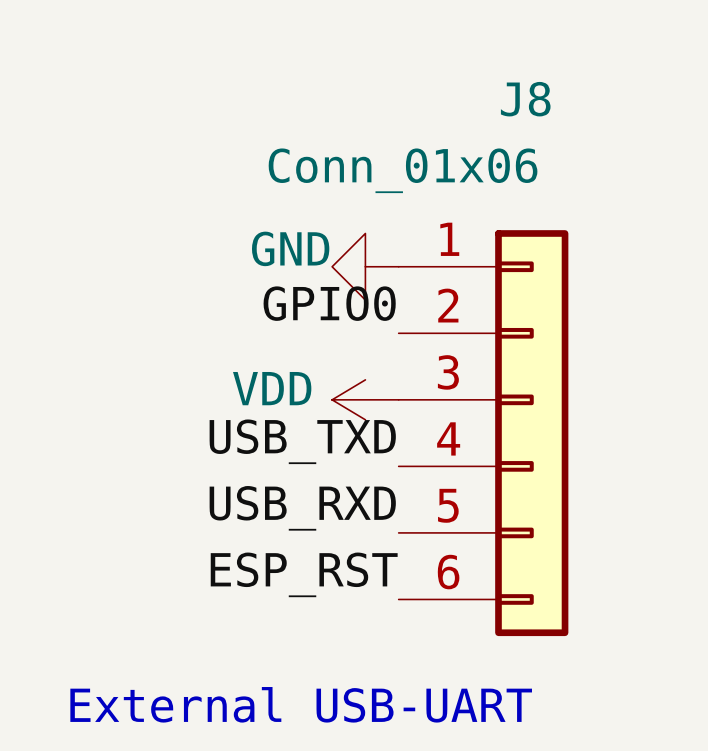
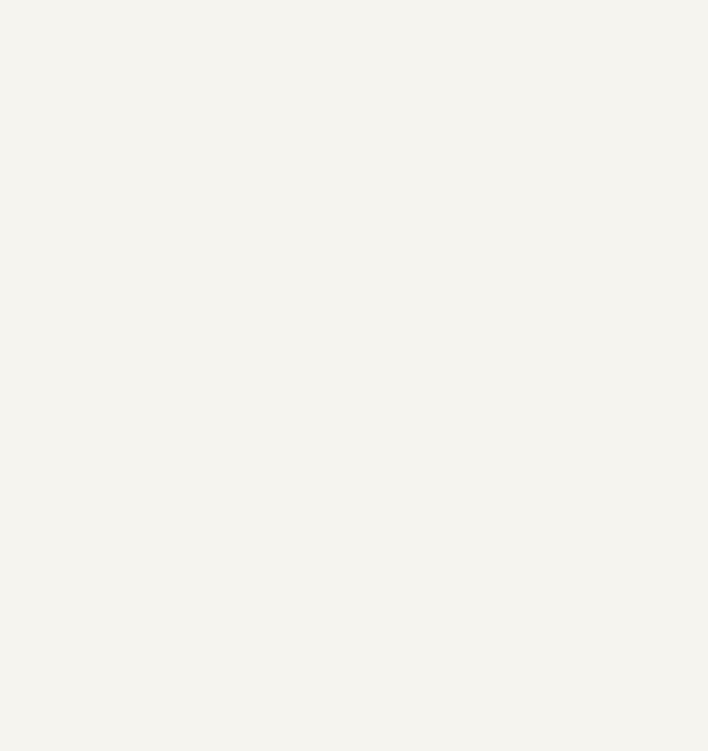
power symbol: GND (365, 266) -> none
label: GPIO0 (329, 303) -> none
power symbol: VDD (365, 399) -> none
J8: Conn_01x06 (483, 433) -> none
label: USB_TXD (302, 441) -> none
label: USB_RXD (302, 508) -> none
label: ESP_RST (304, 574) -> none
text: External USB-UART (301, 704) -> none

